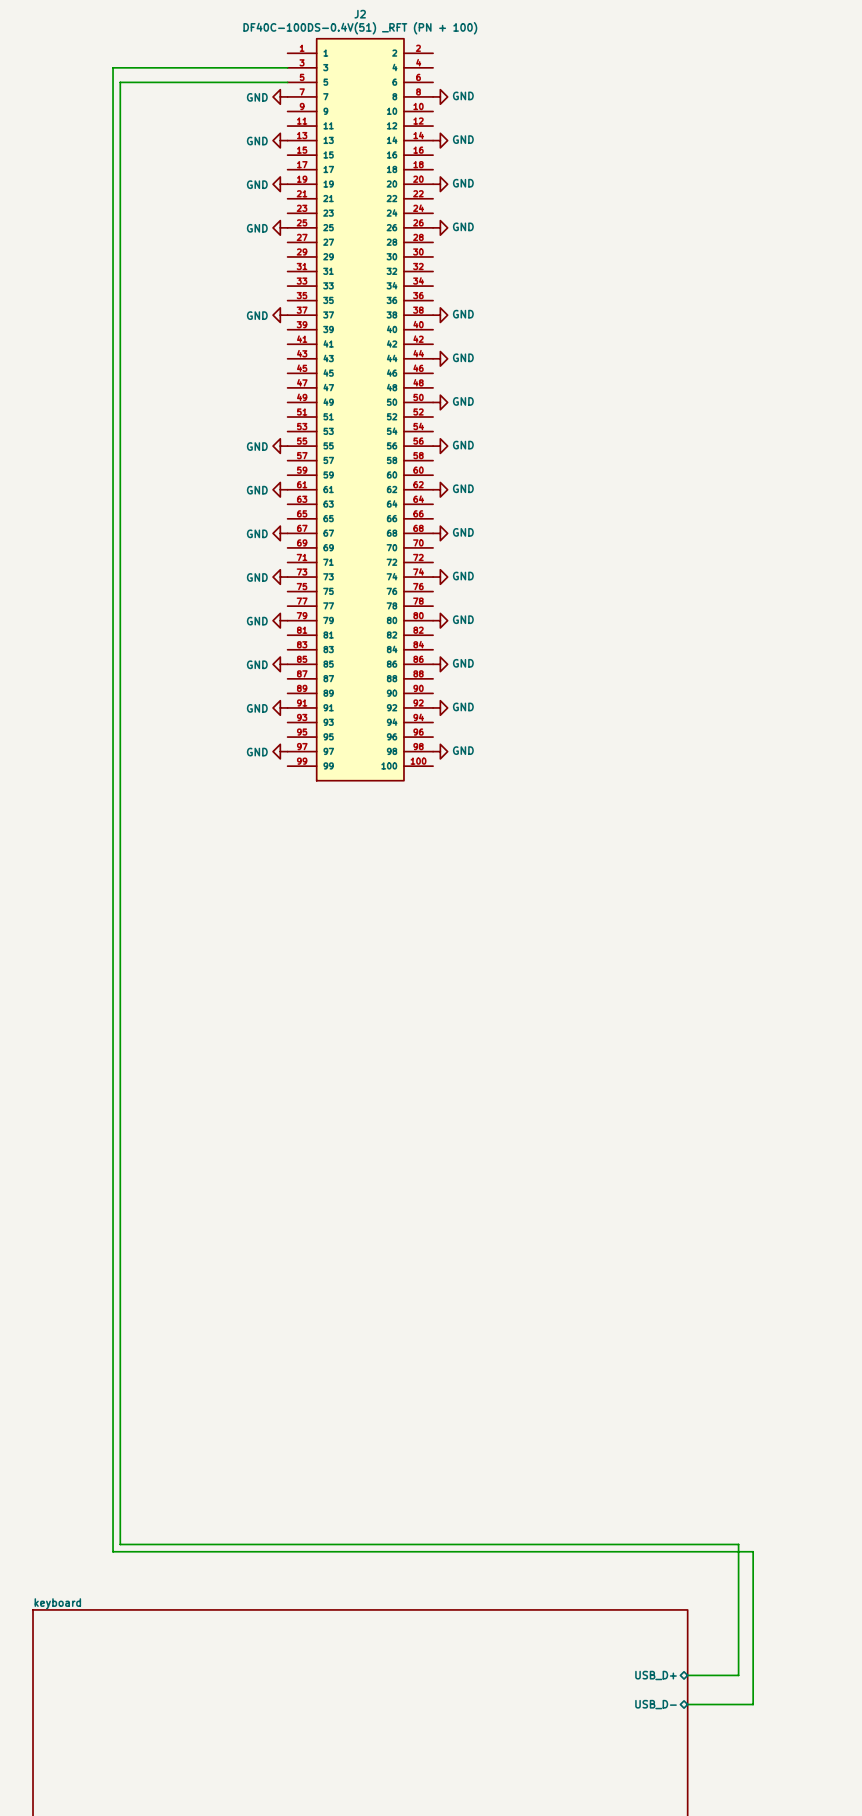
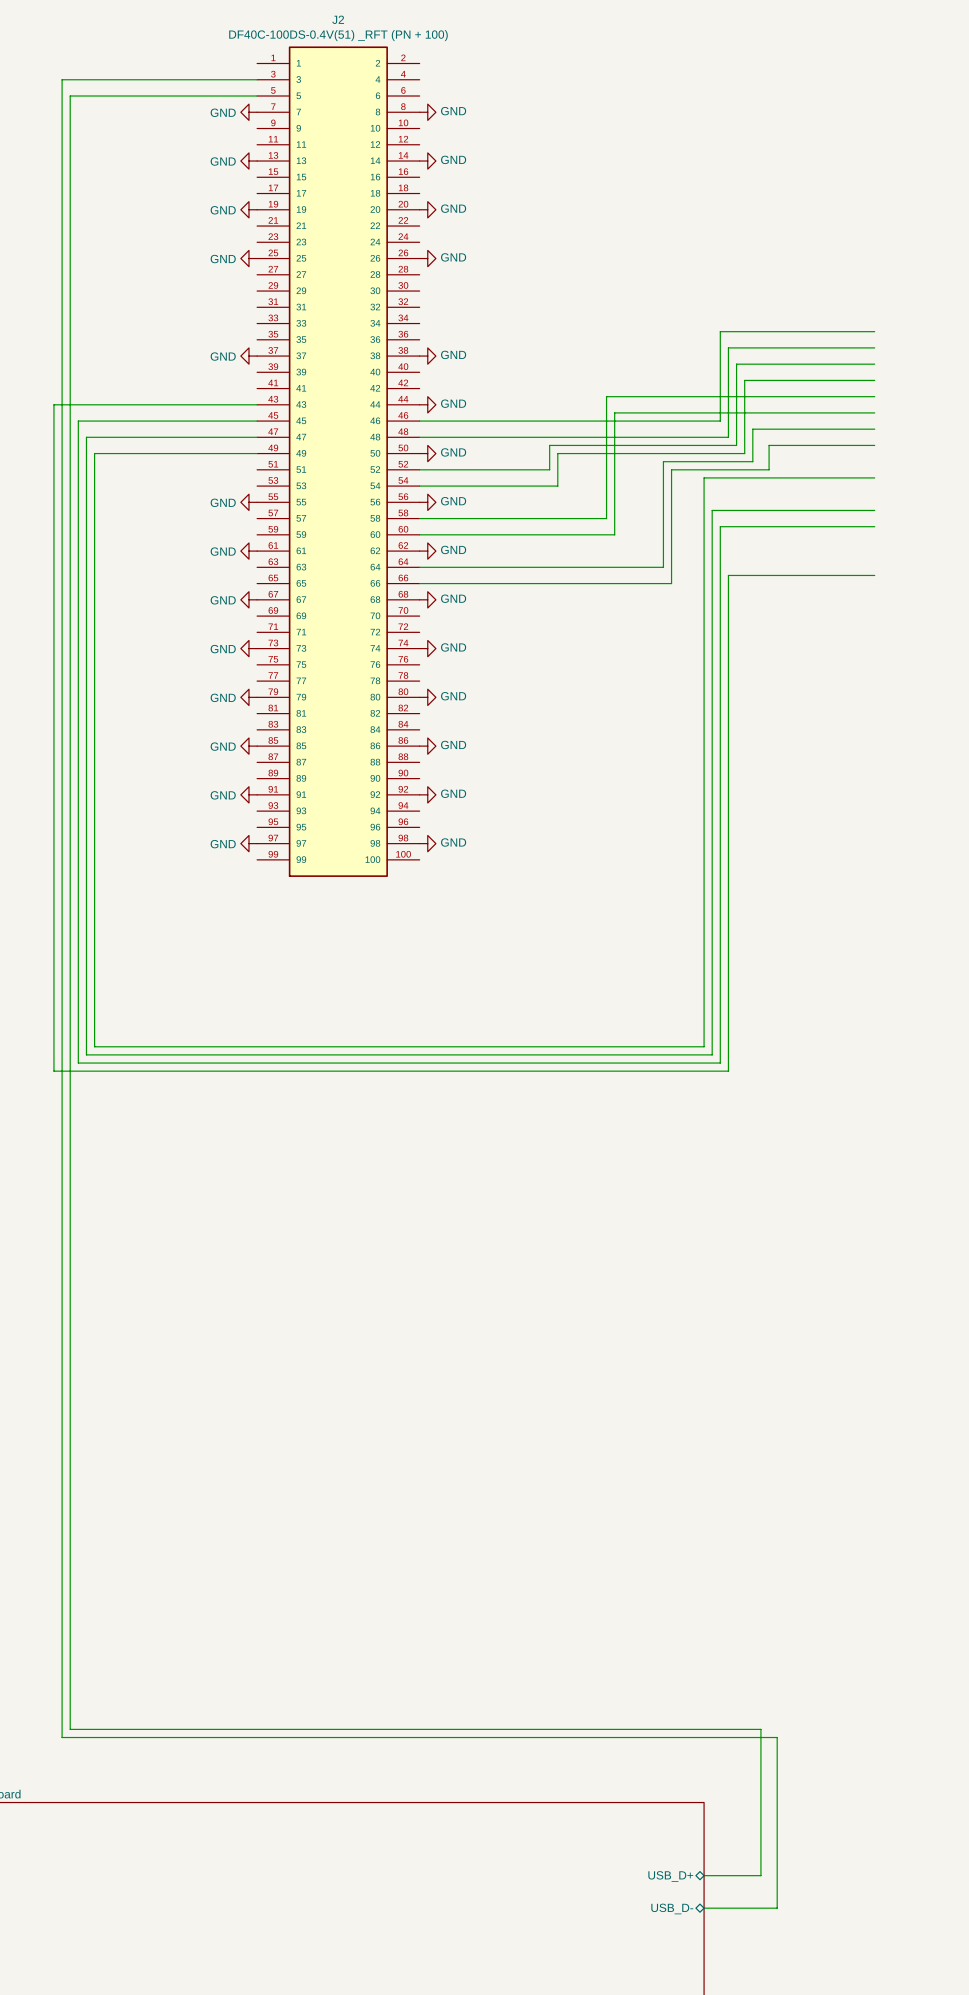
wire: none -> (874, 331) (720, 331) (720, 421) (419, 421)
wire: none -> (874, 347) (728, 347) (728, 437) (419, 437)
wire: none -> (874, 364) (736, 364) (736, 445) (549, 445) (549, 469) (419, 469)
wire: none -> (874, 380) (744, 380) (744, 453) (557, 453) (557, 486) (419, 486)
wire: none -> (874, 396) (606, 396) (606, 518) (419, 518)
wire: none -> (257, 404) (53, 404) (53, 1071) (728, 1071) (728, 575) (874, 575)
wire: none -> (874, 412) (614, 412) (614, 534) (419, 534)
wire: none -> (257, 421) (78, 421) (78, 1063) (720, 1063) (720, 526) (874, 526)
wire: none -> (874, 429) (752, 429) (752, 461) (663, 461) (663, 567) (419, 567)
wire: none -> (257, 437) (86, 437) (86, 1054) (712, 1054) (712, 510) (874, 510)
wire: none -> (874, 445) (769, 445) (769, 469) (671, 469) (671, 583) (419, 583)
wire: none -> (257, 453) (94, 453) (94, 1046) (704, 1046) (704, 477) (874, 477)

